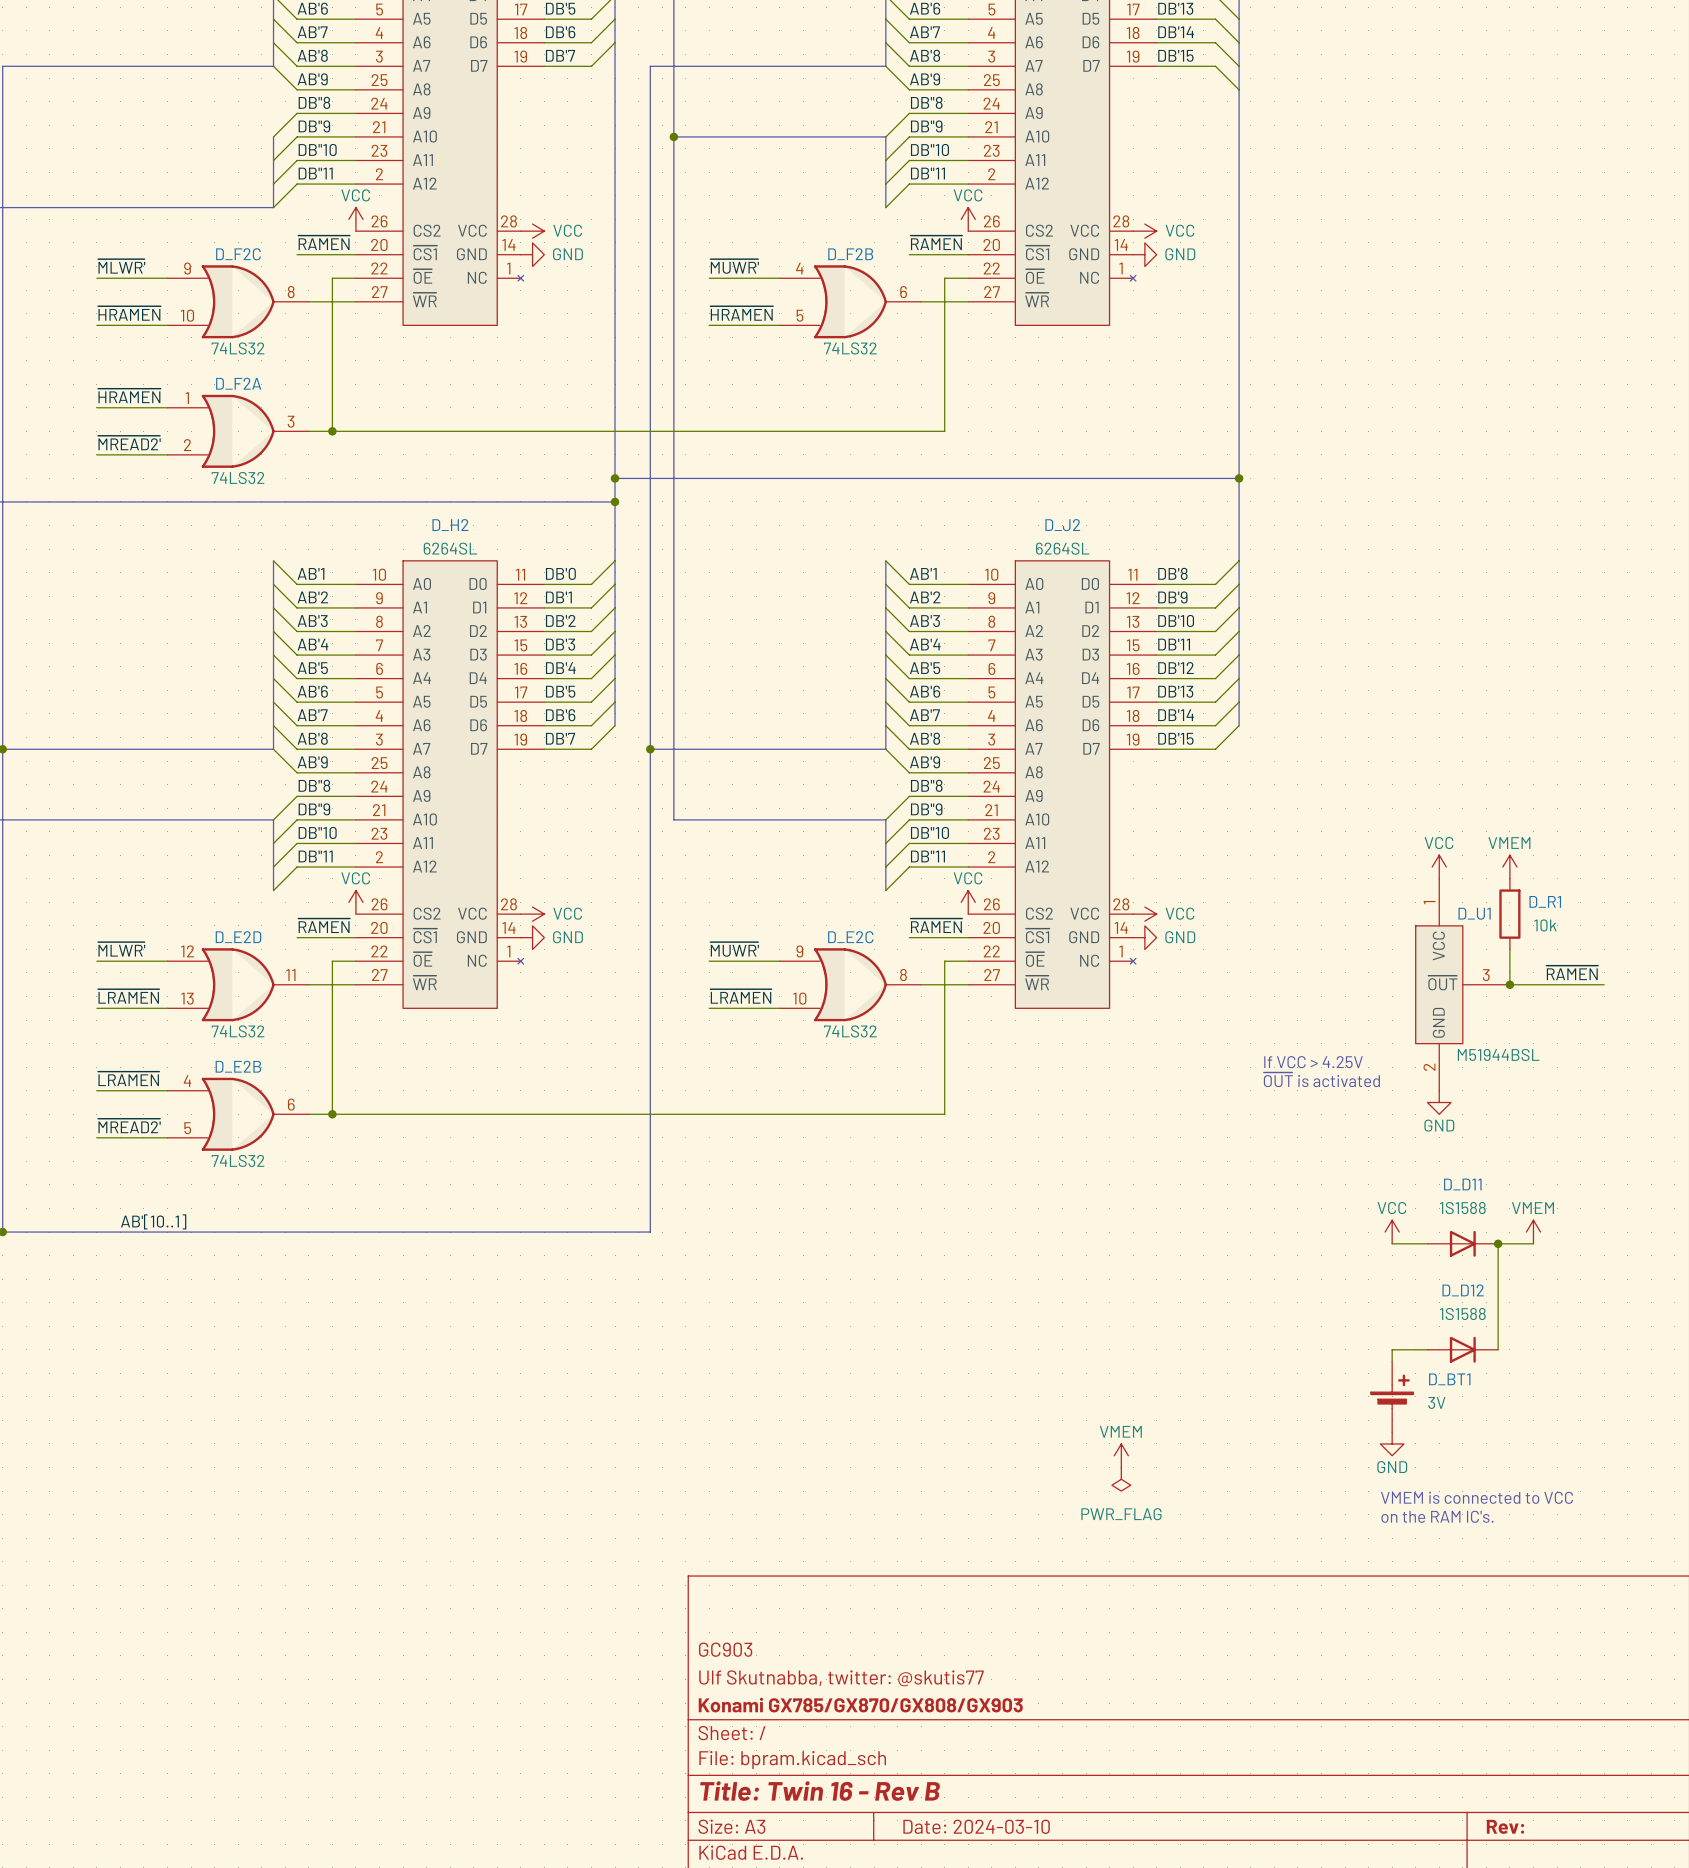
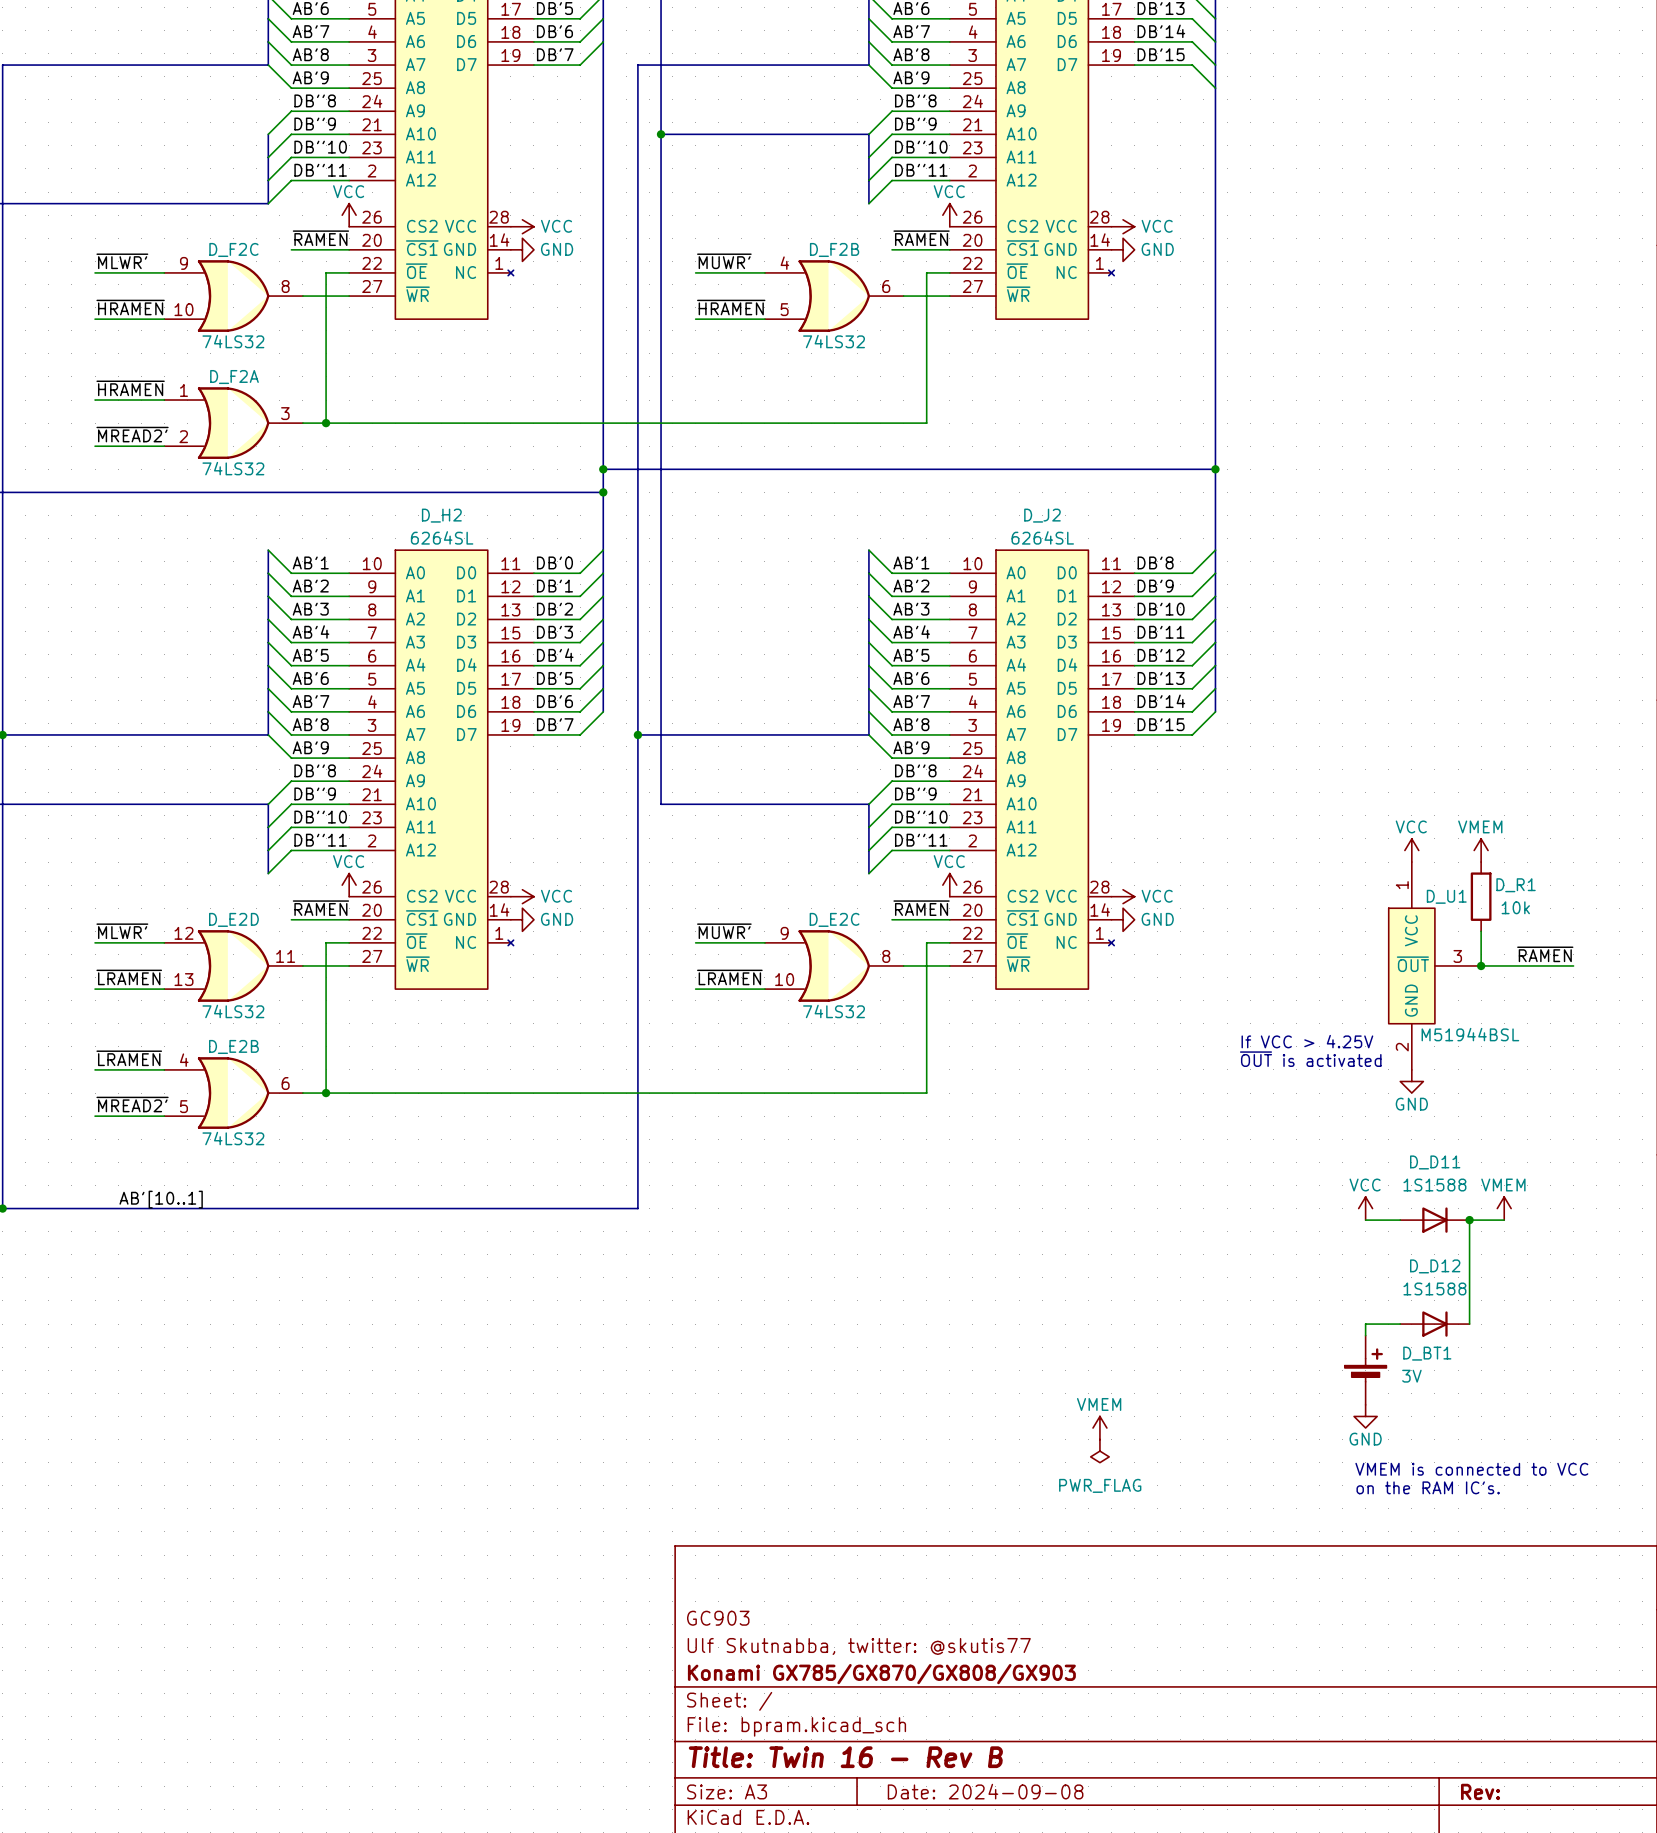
title block: Date: 2024-03-10 (976, 1826) -> Date: 2024-09-08 (985, 1791)

